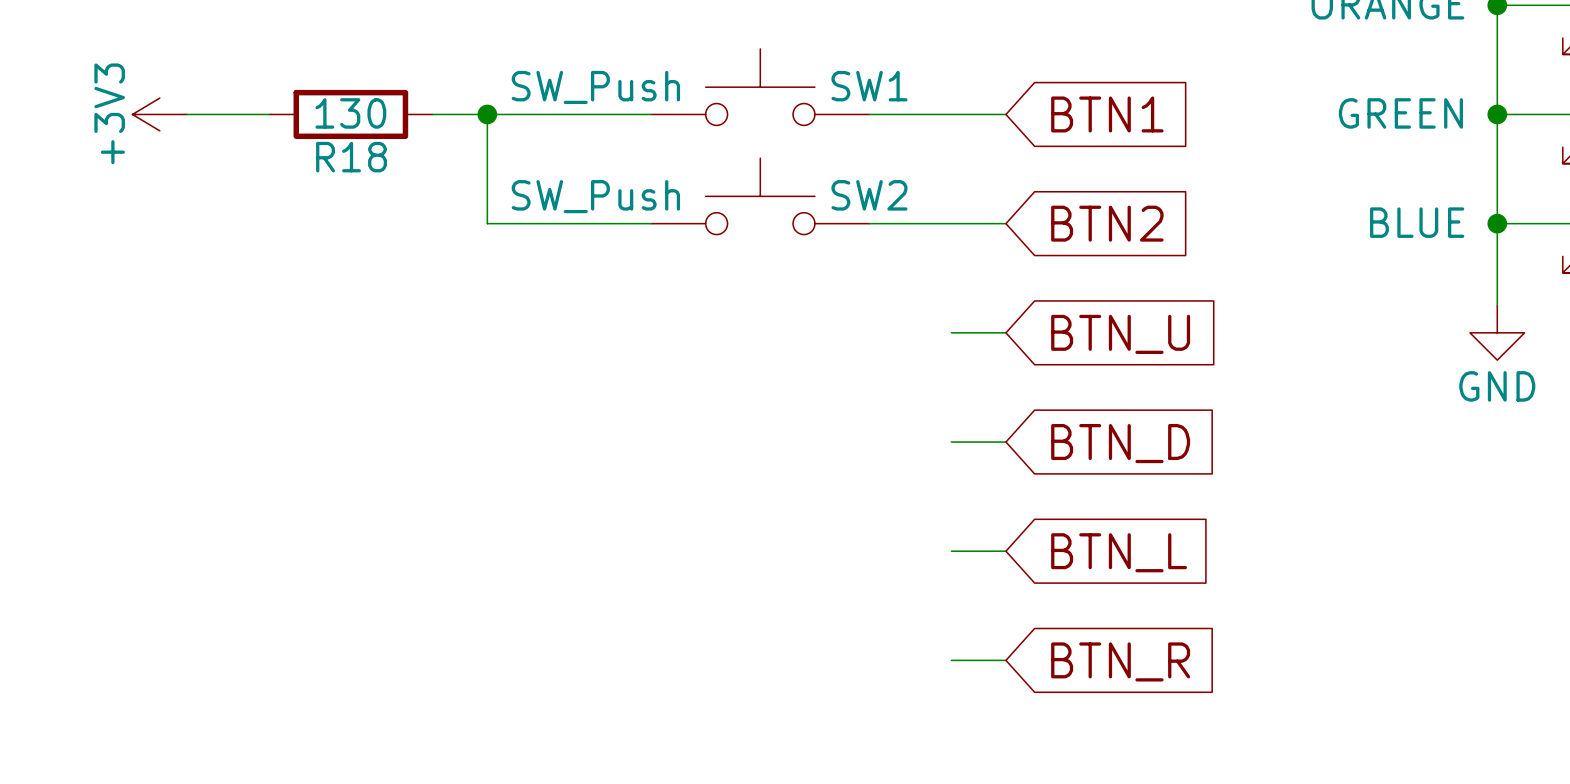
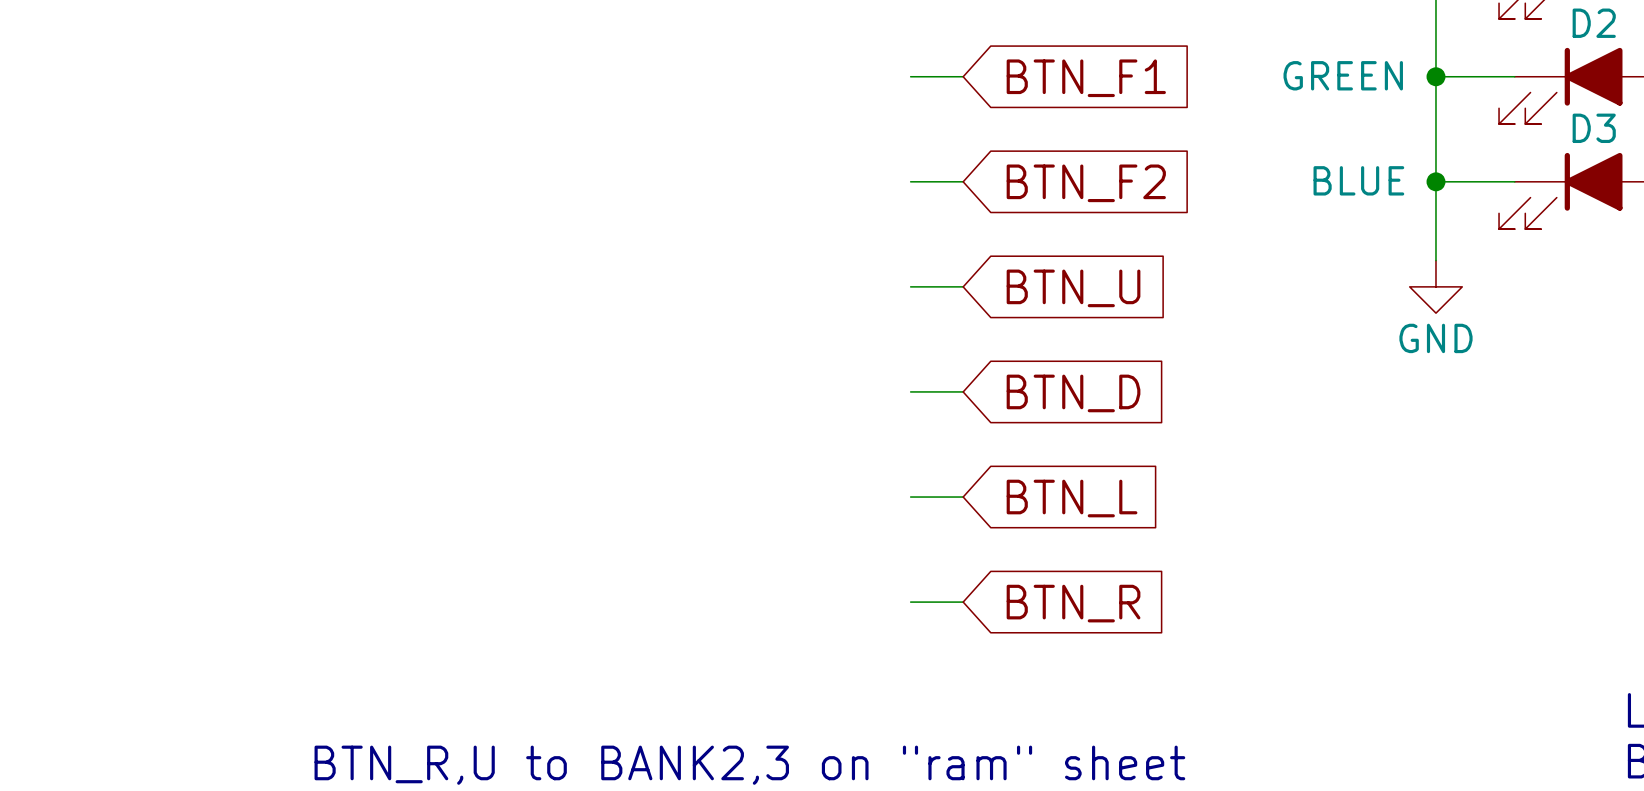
SW1: SW_Push (760, 87) -> none
power symbol: +3V3 (159, 114) -> none
wire: (187, 114) (268, 114) -> none
R18: 130 (350, 114) -> none
wire: (432, 114) (651, 114) -> none
wire: (487, 114) (487, 223) (651, 223) -> none
junction: (487, 114) -> none
wire: (869, 114) (951, 114) -> none
global label: BTN1 (1107, 114) -> BTN_F1 (1086, 78)
SW2: SW_Push (760, 196) -> none
wire: (869, 223) (951, 223) -> none
global label: BTN2 (1107, 223) -> BTN_F2 (1086, 183)

